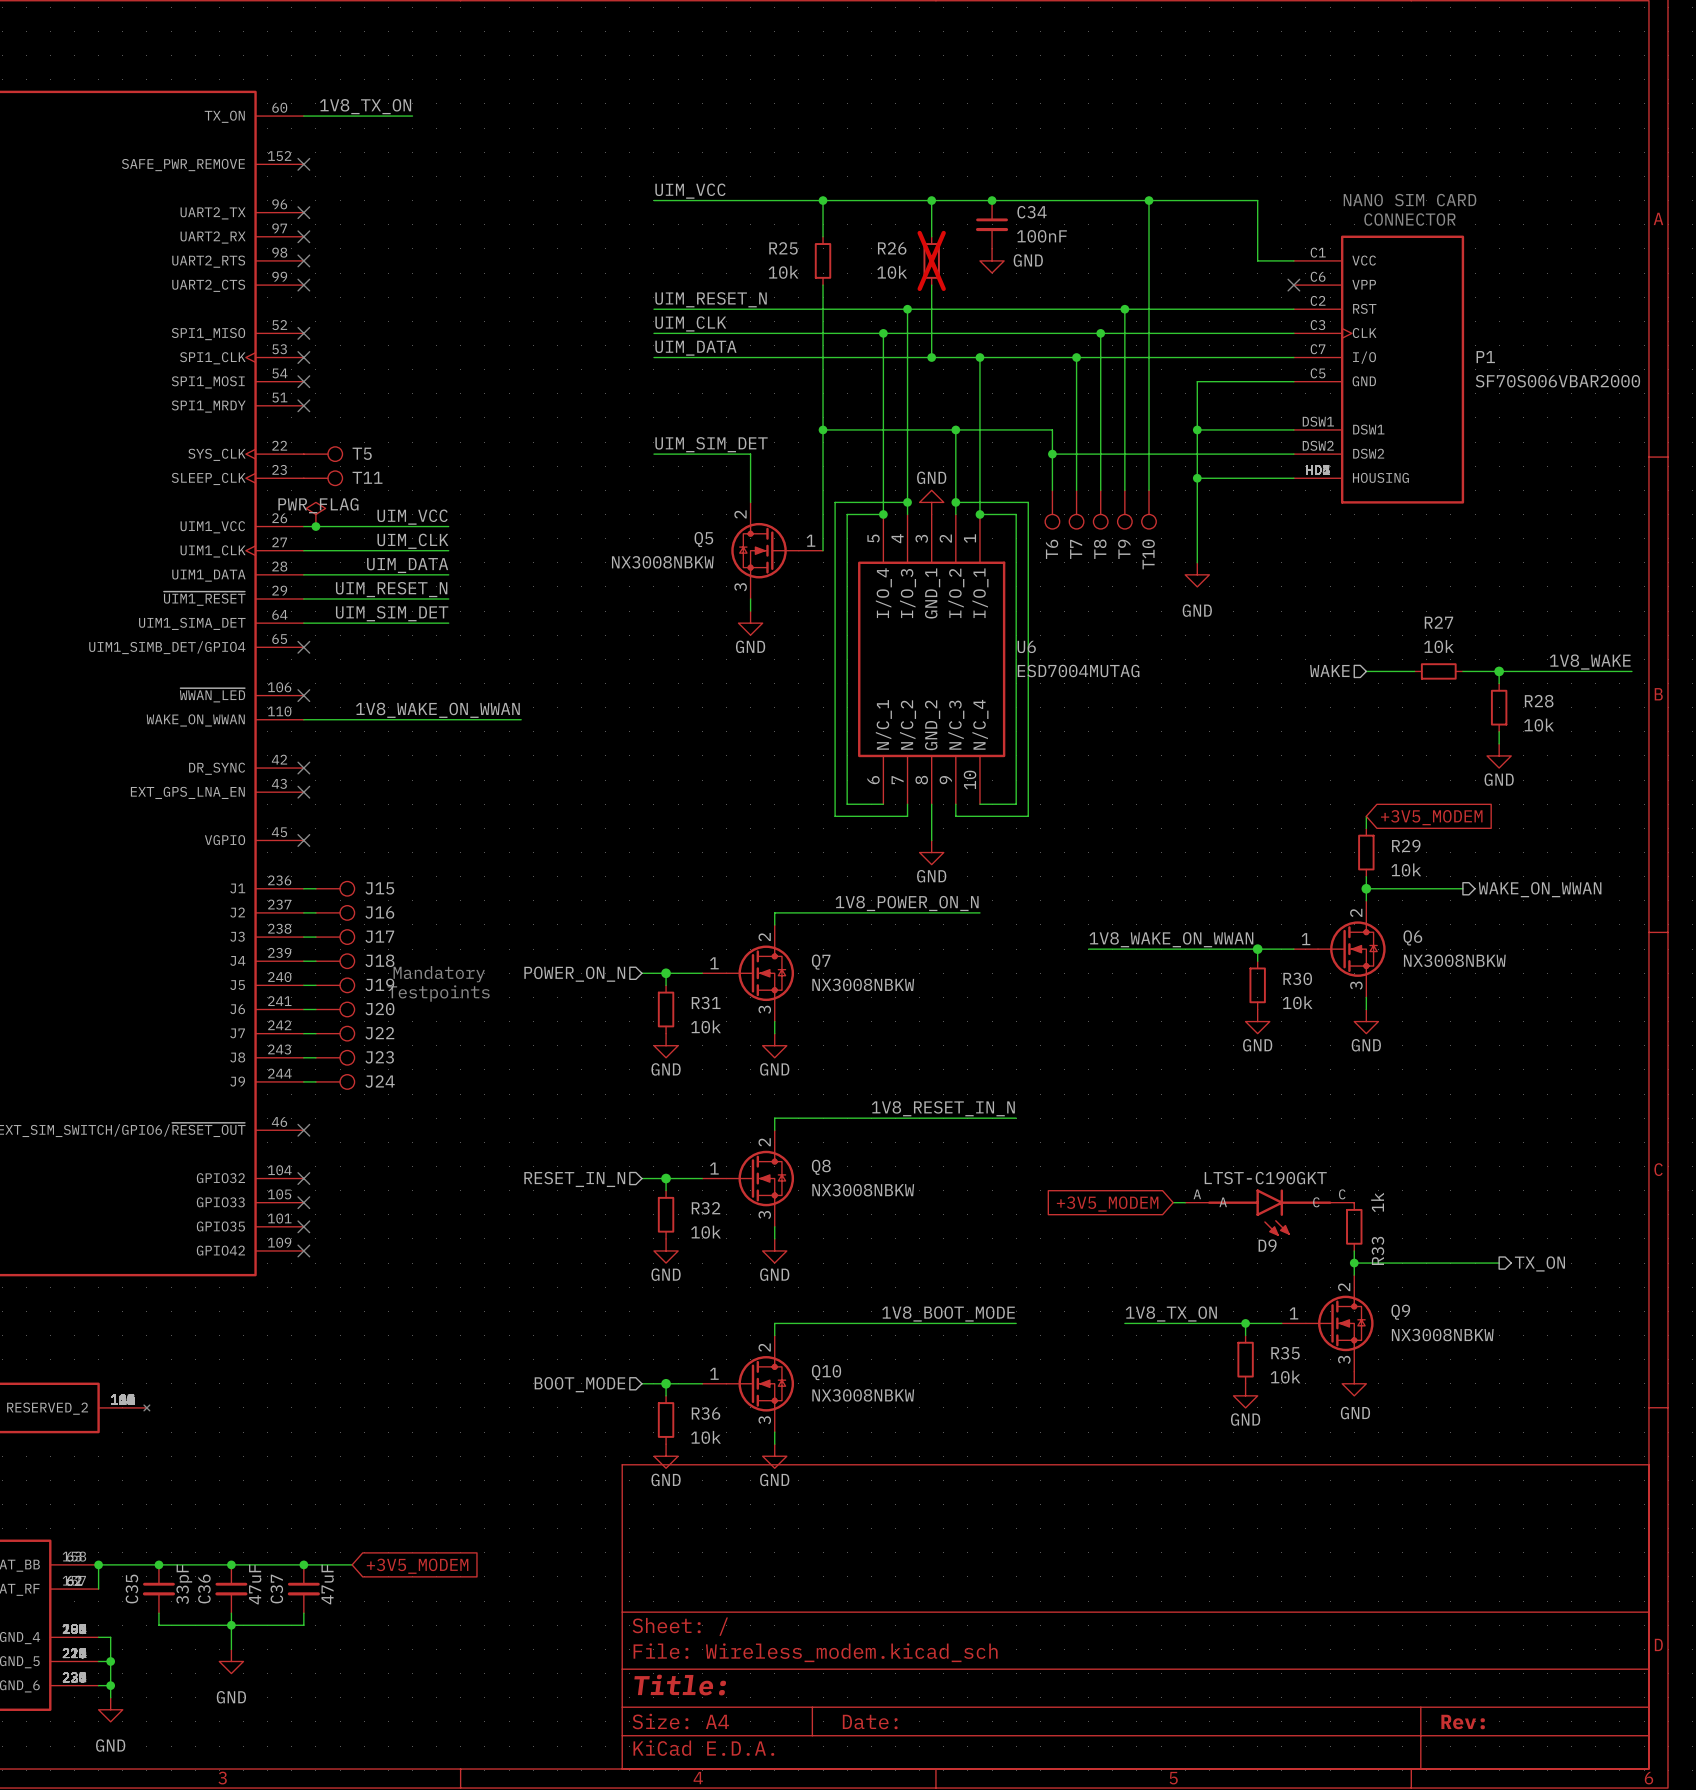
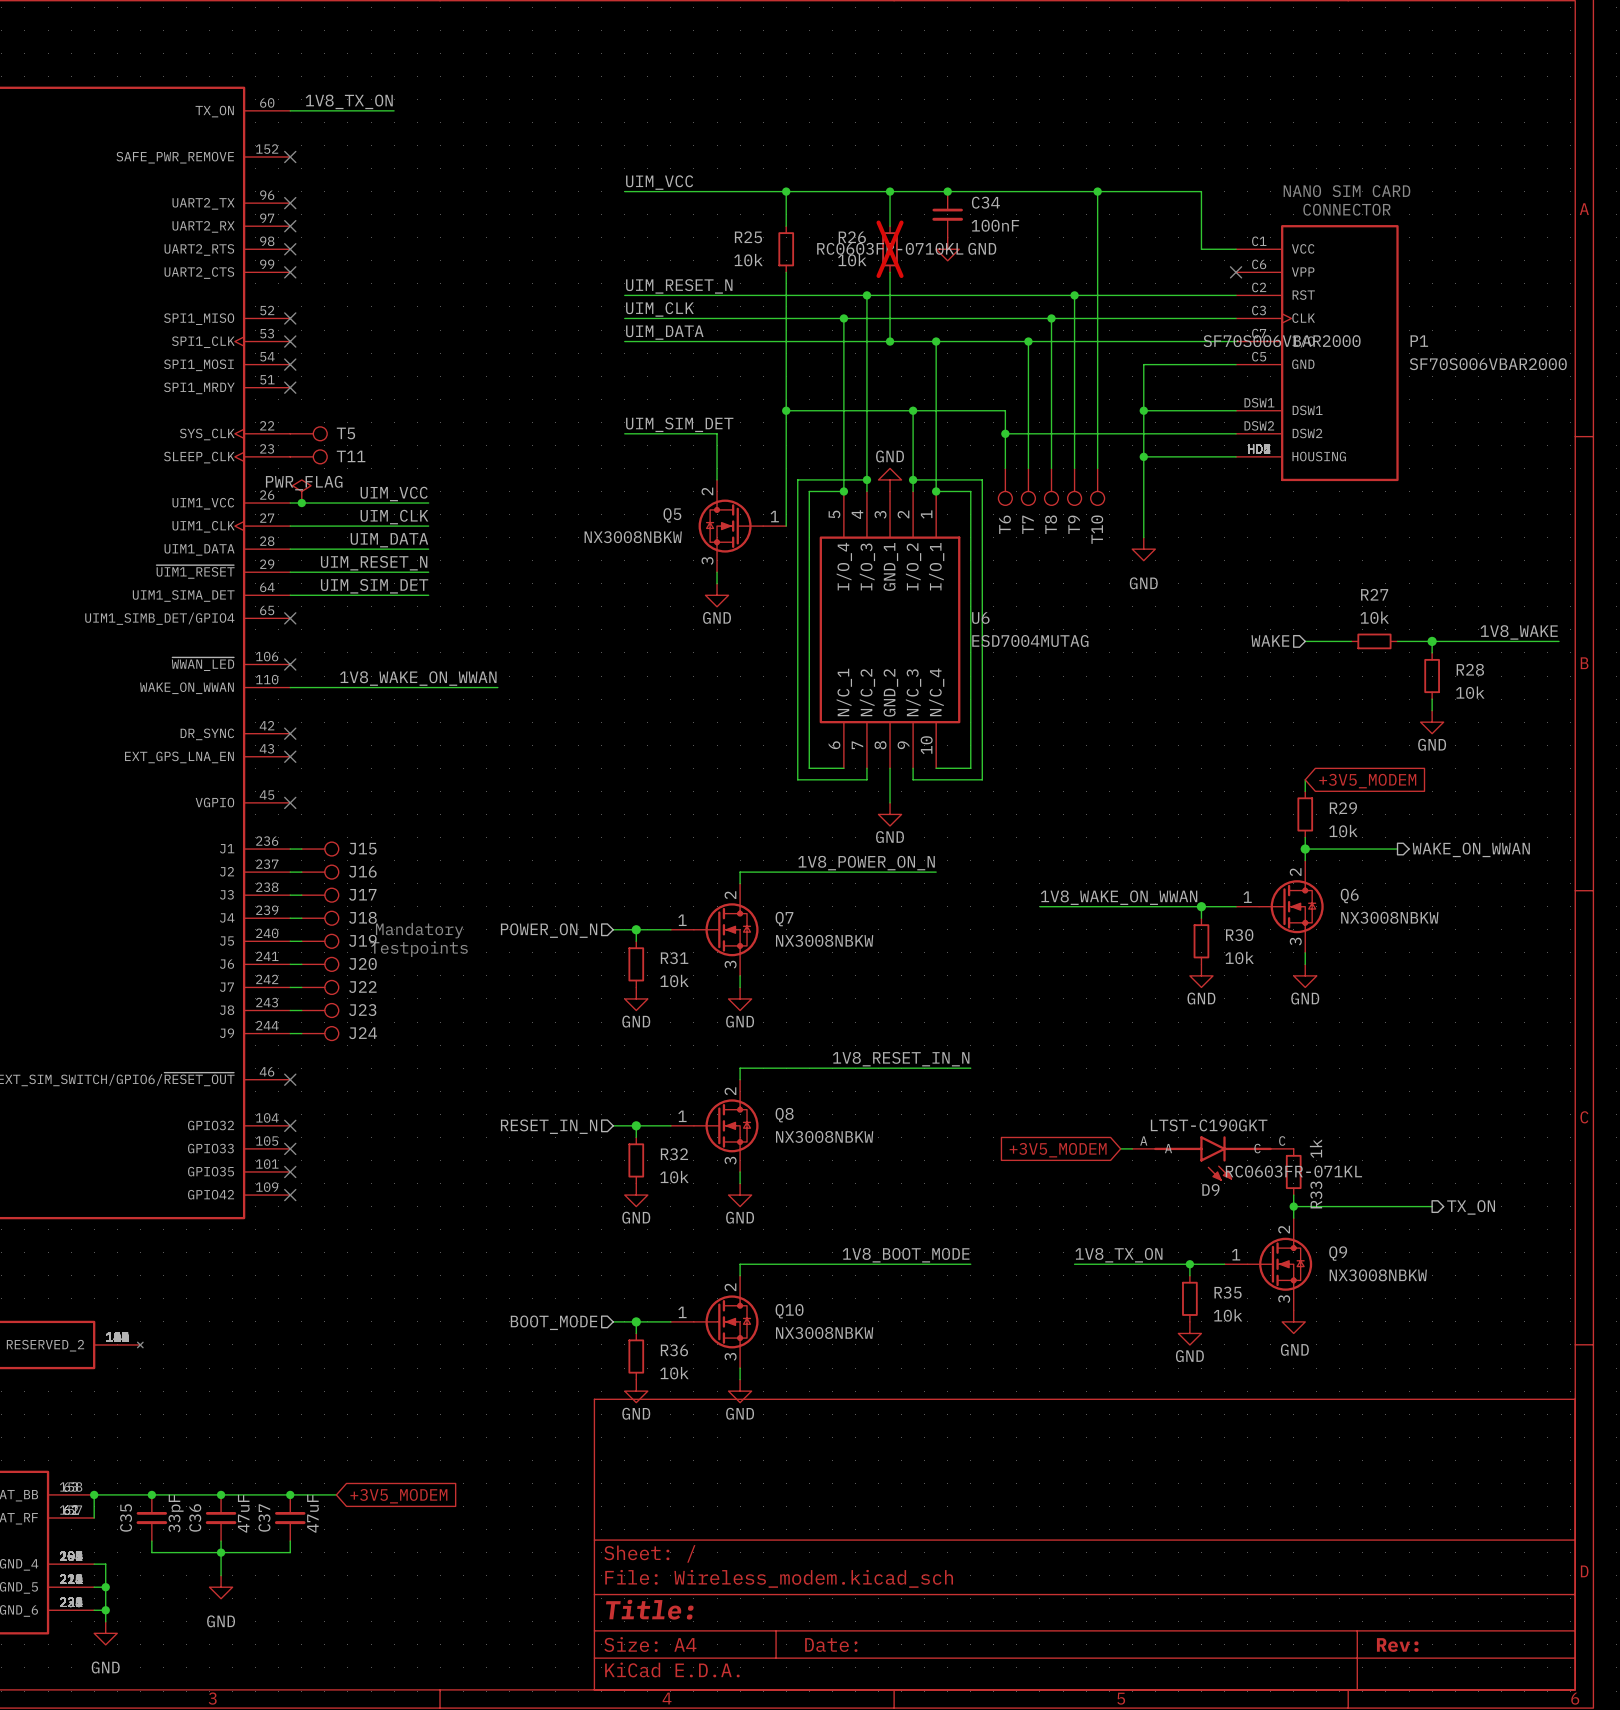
R26 text: none -> RC0603FR-0710KL (890, 248)
P1 text: none -> SF70S006VBAR2000 (1282, 341)
R33 text: none -> RC0603FR-071KL (1293, 1171)

